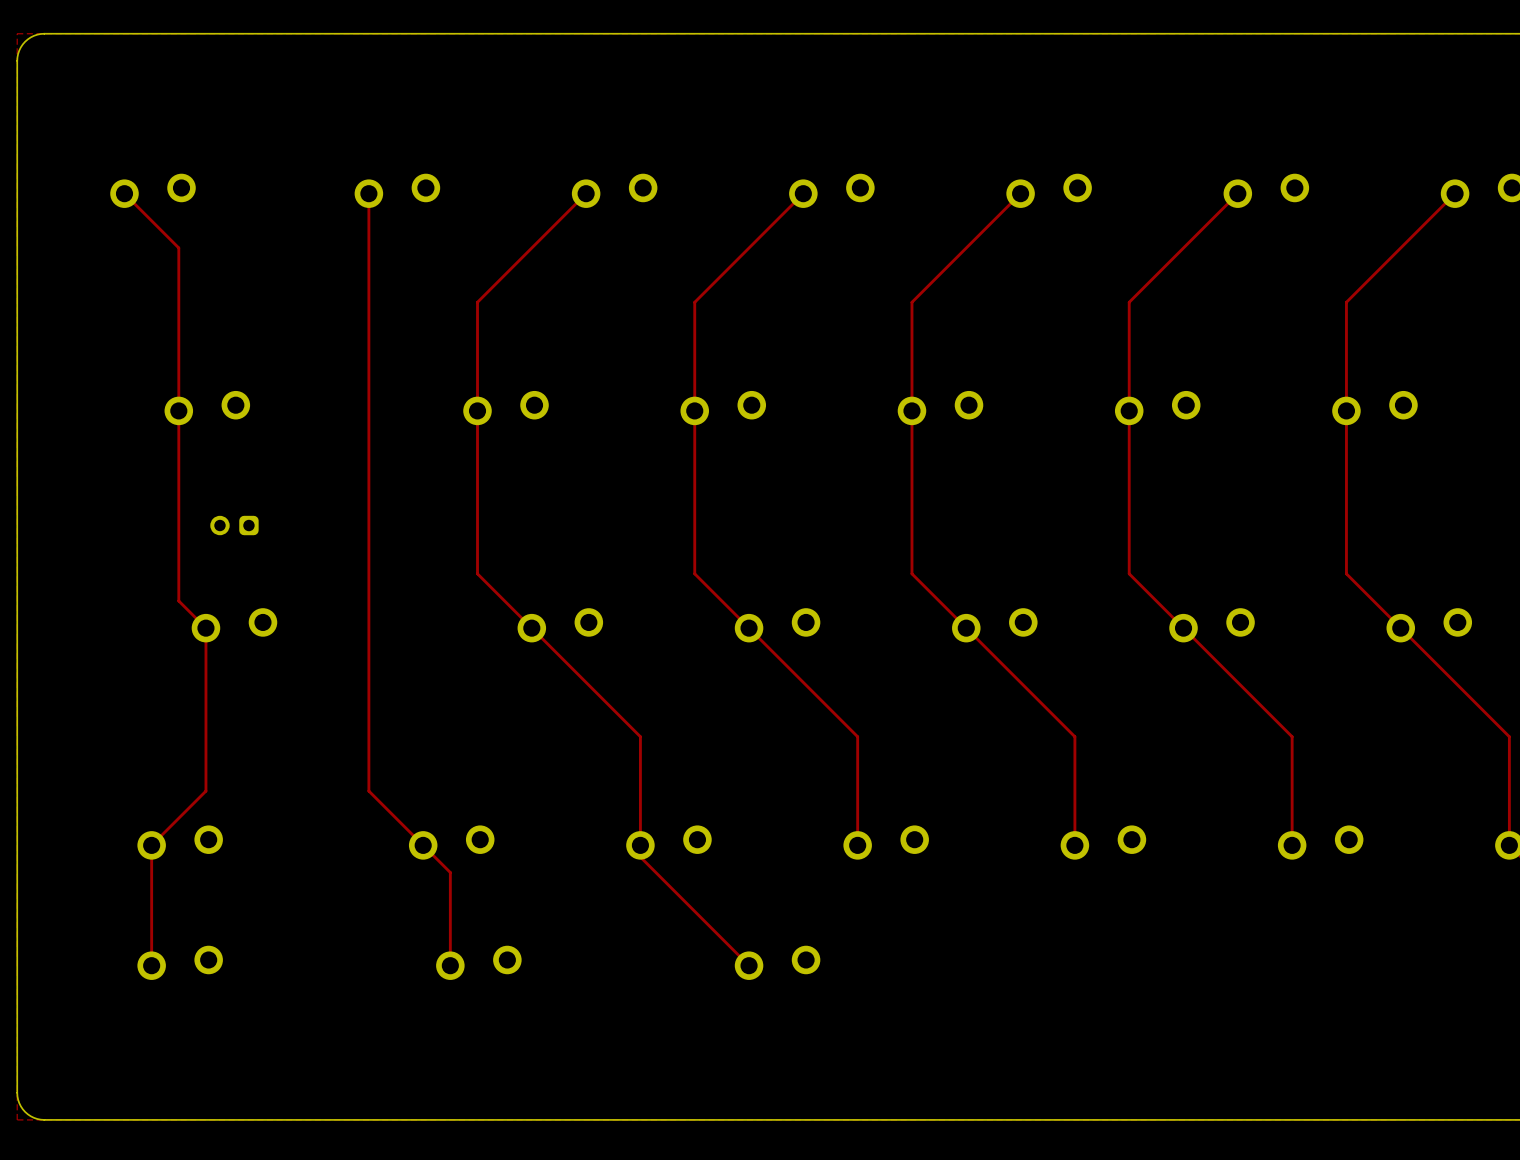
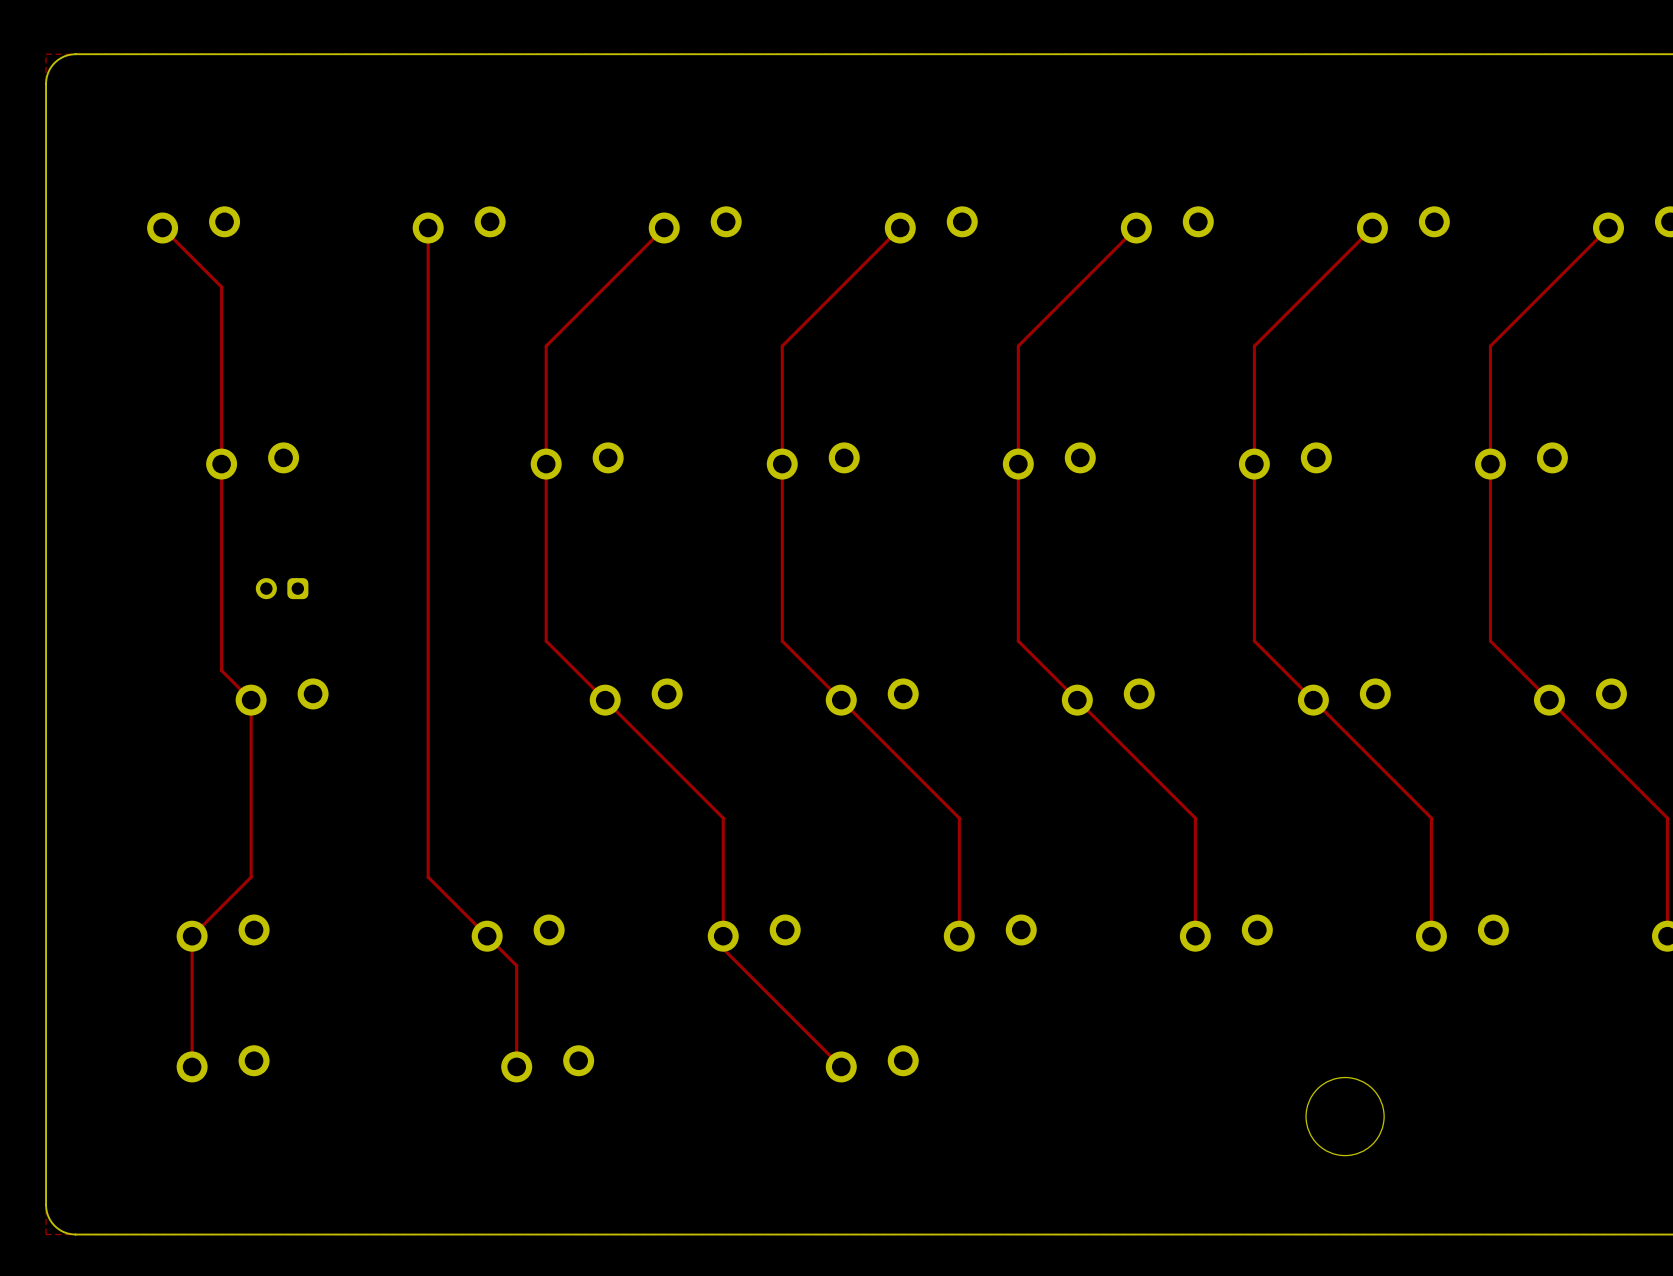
round board edge: none -> [1305, 1076, 1385, 1157]

